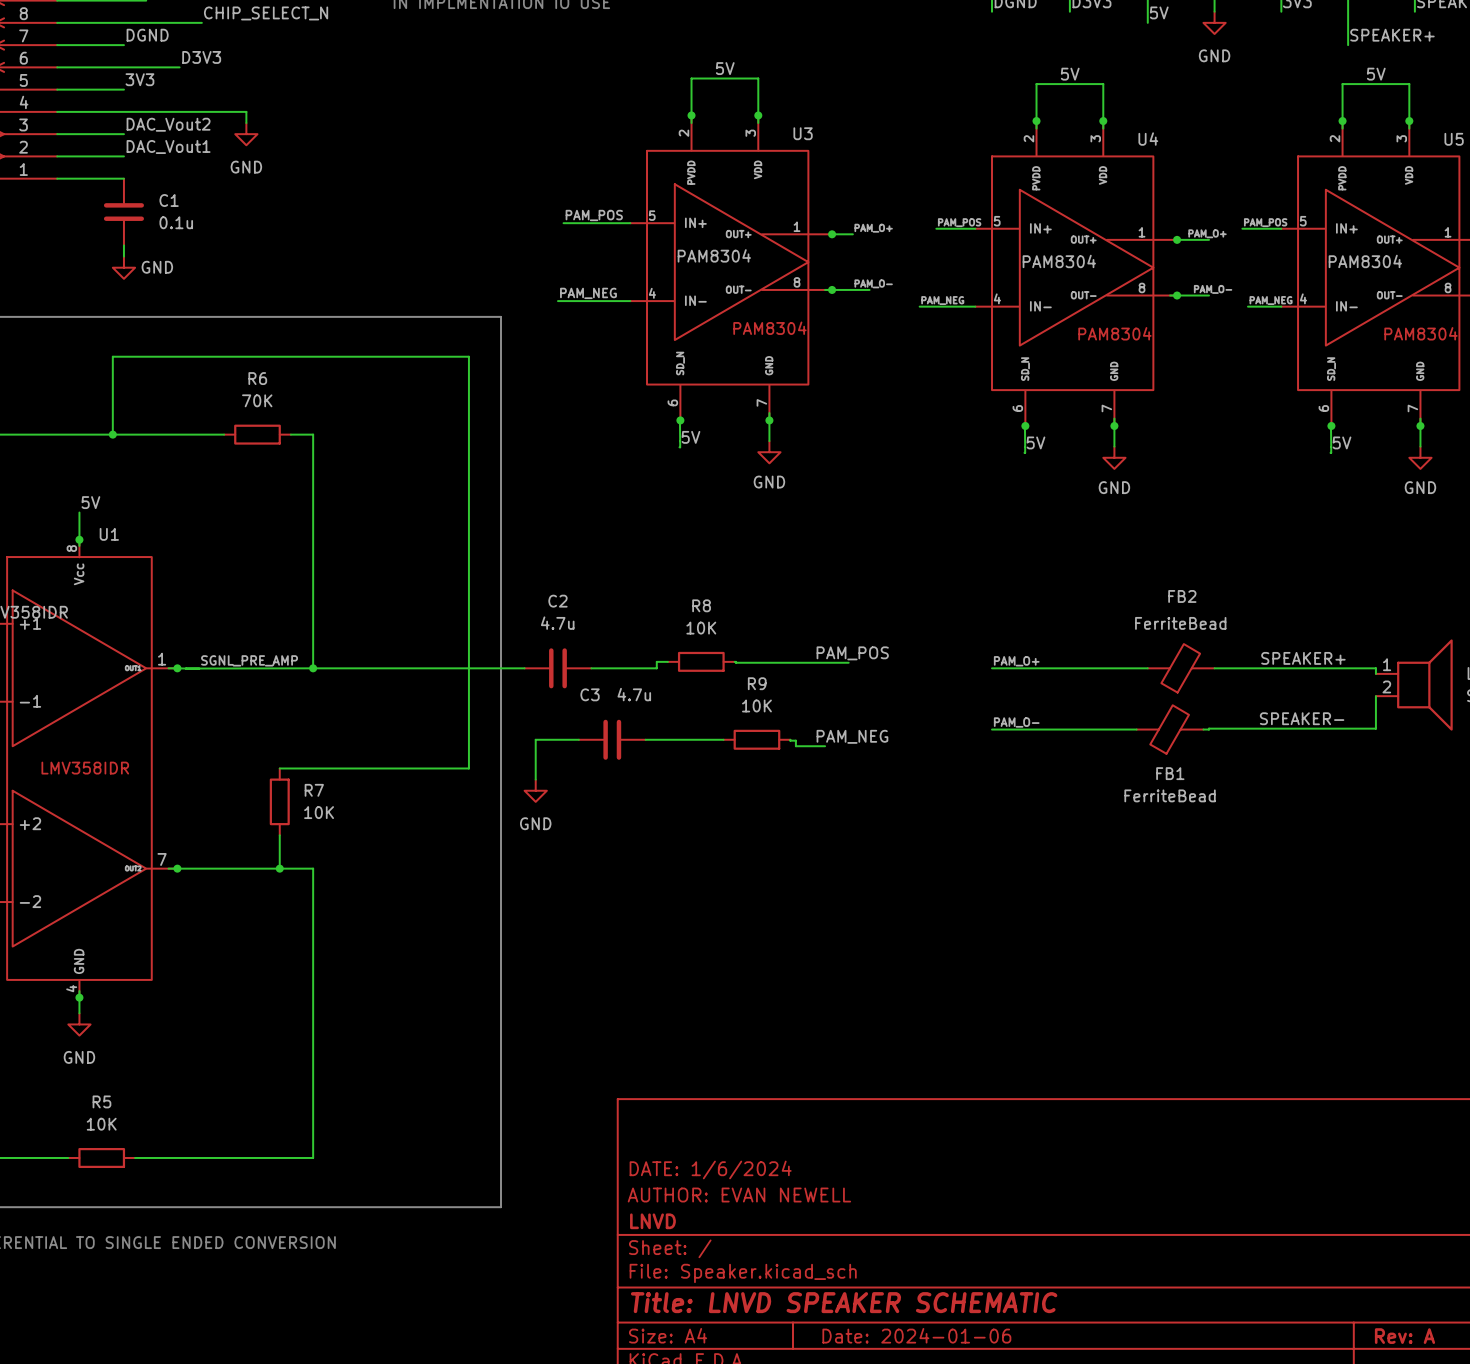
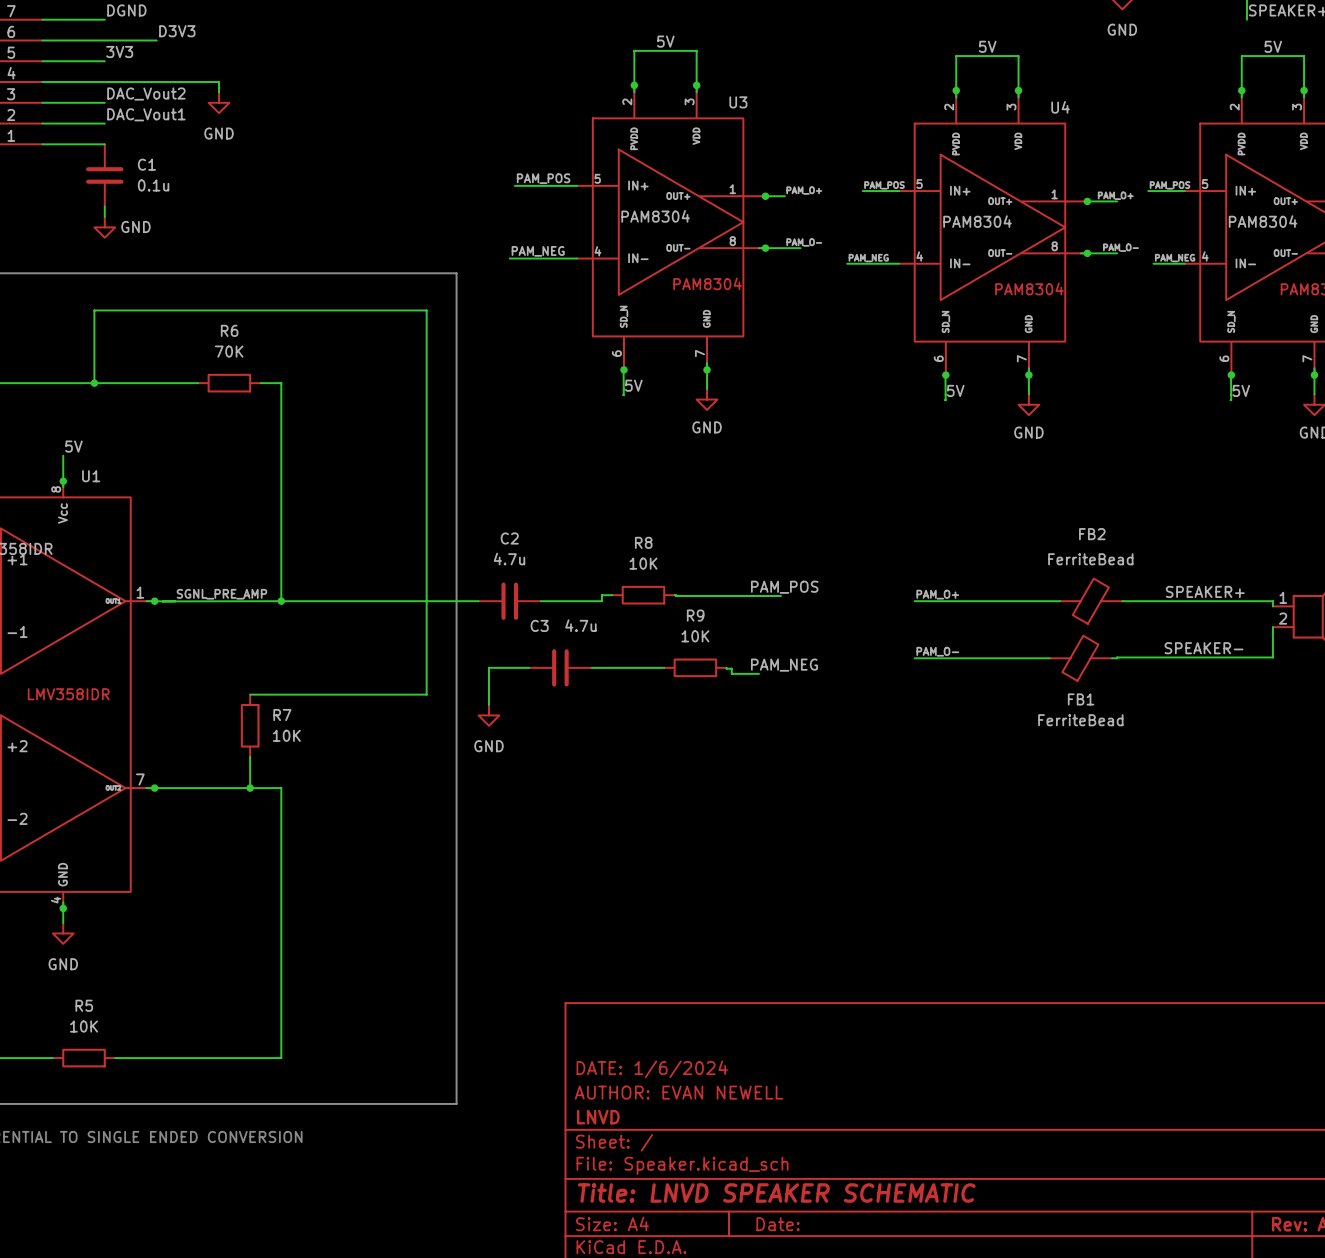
title block: Date: 2024-01-06 (916, 1335) -> Date: (778, 1224)

